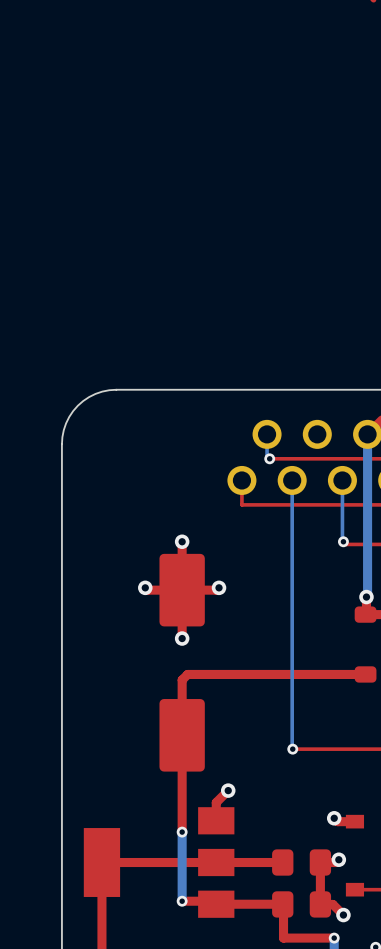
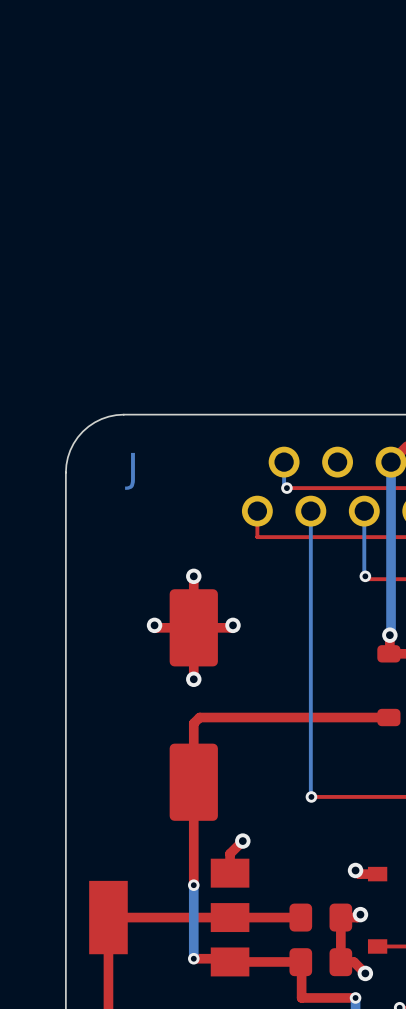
text: none -> J (130, 471)

